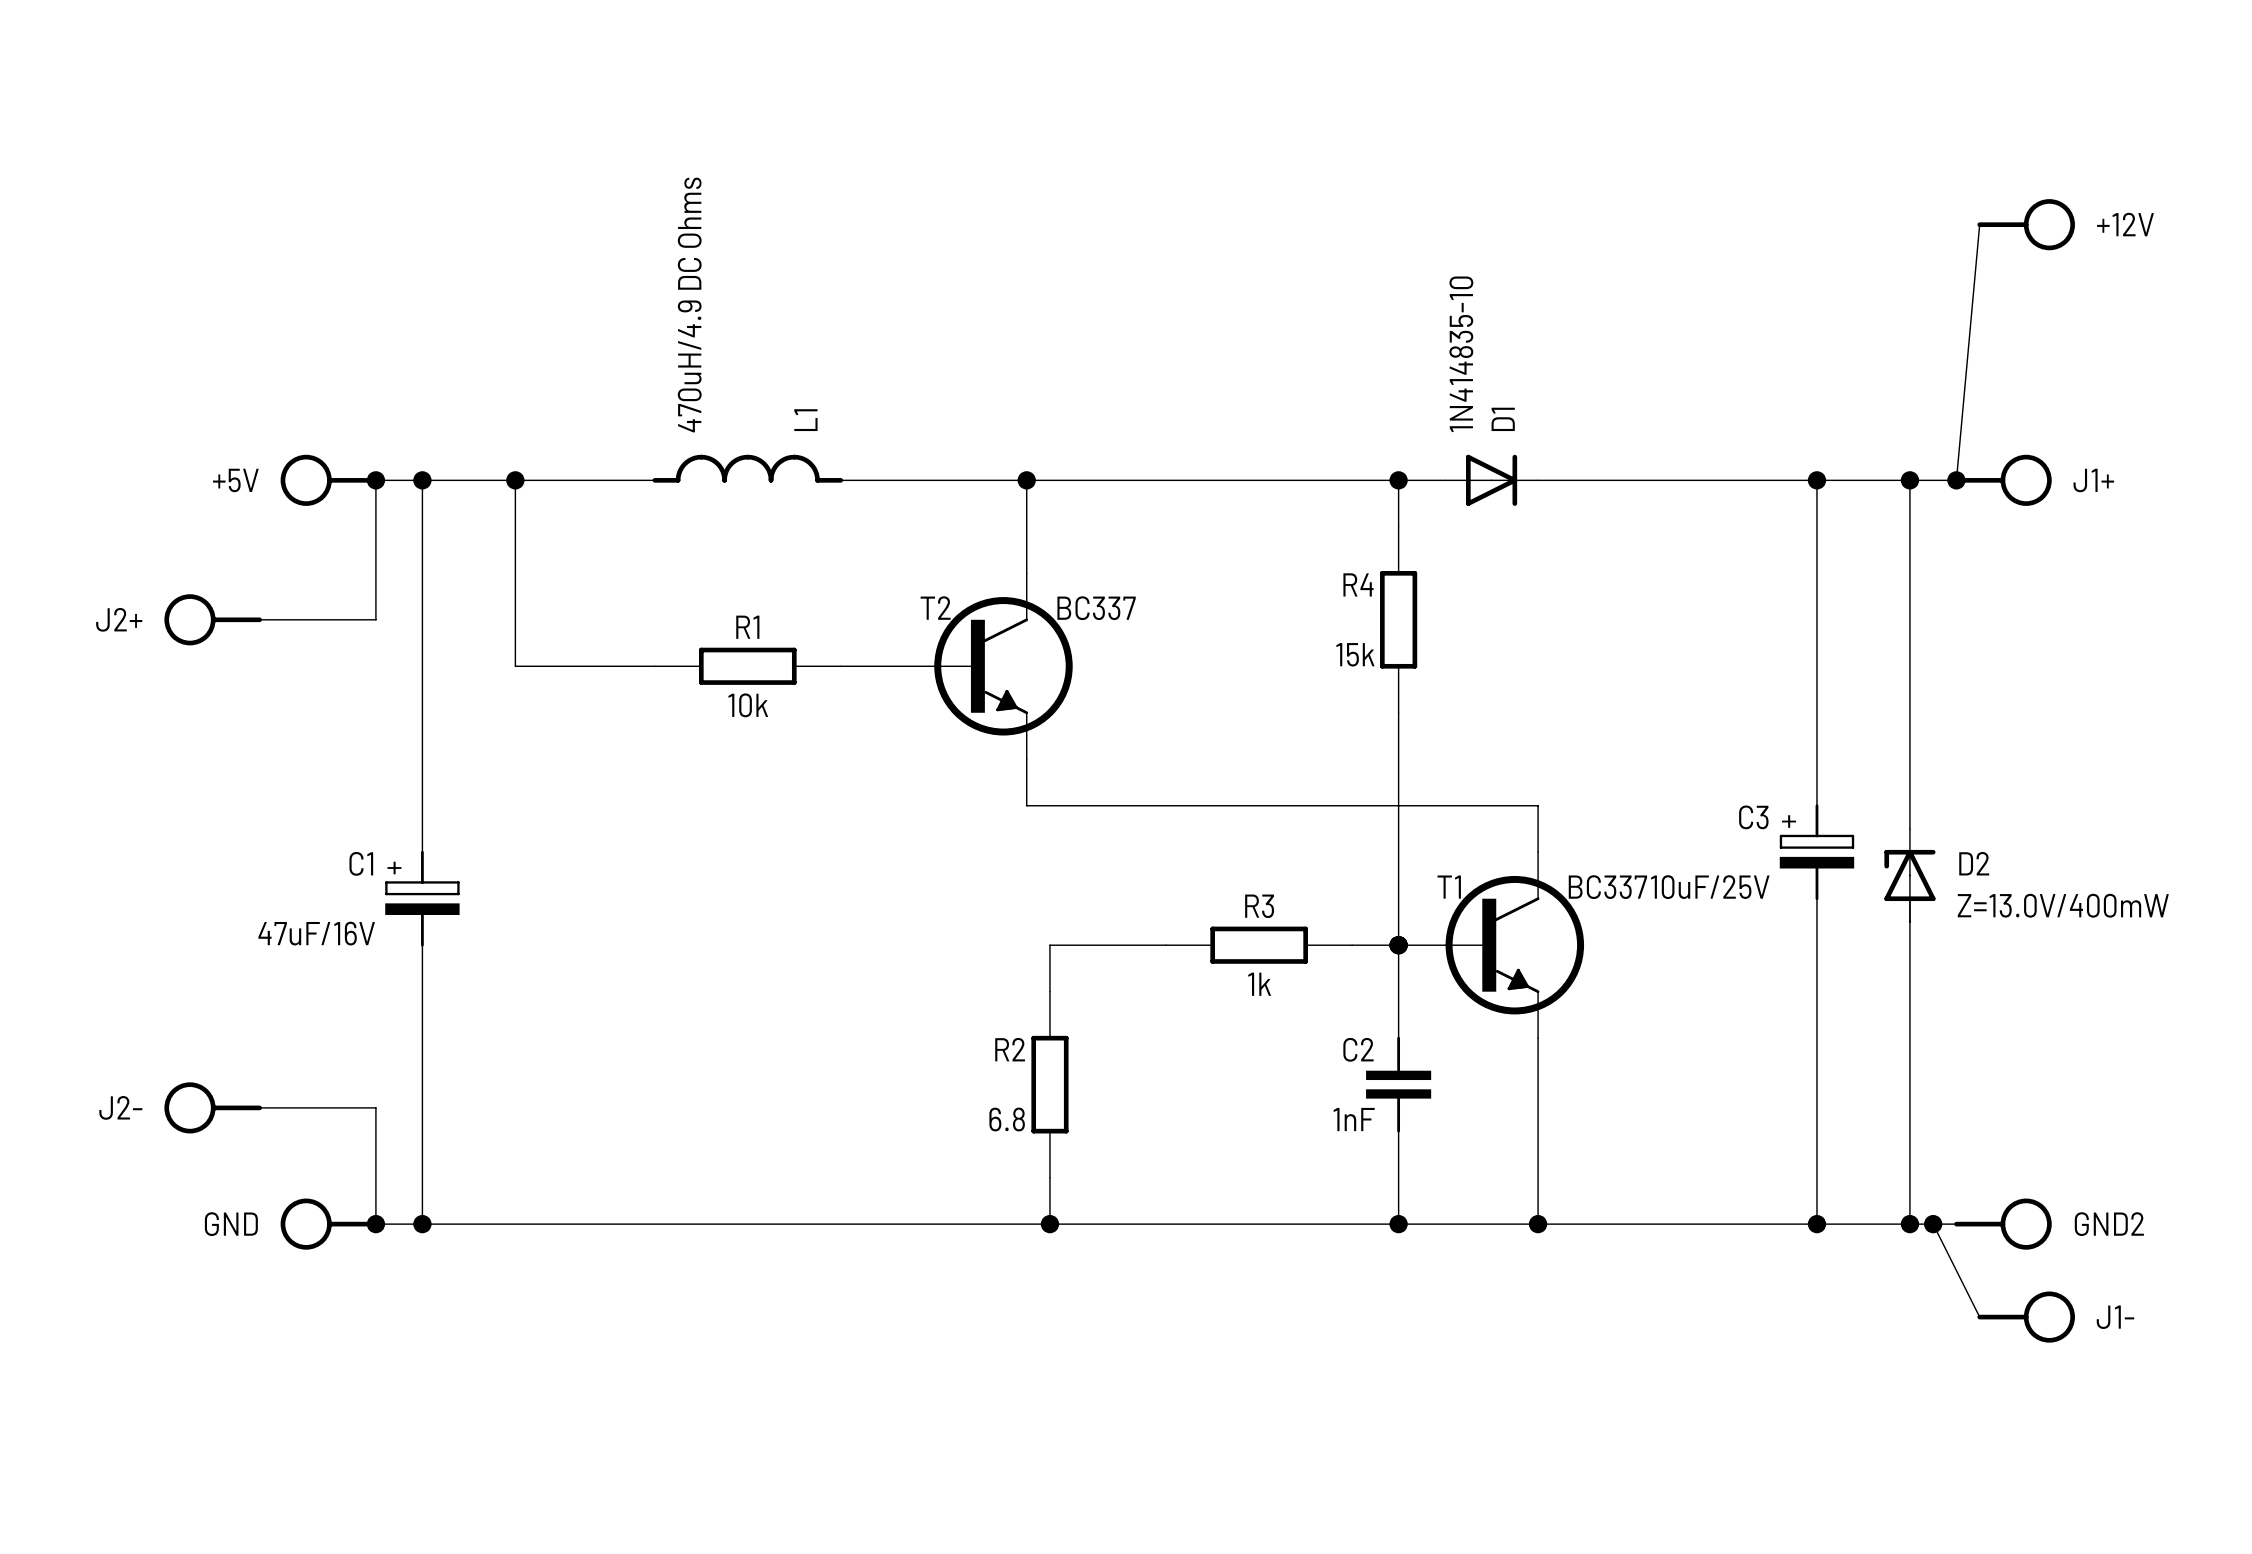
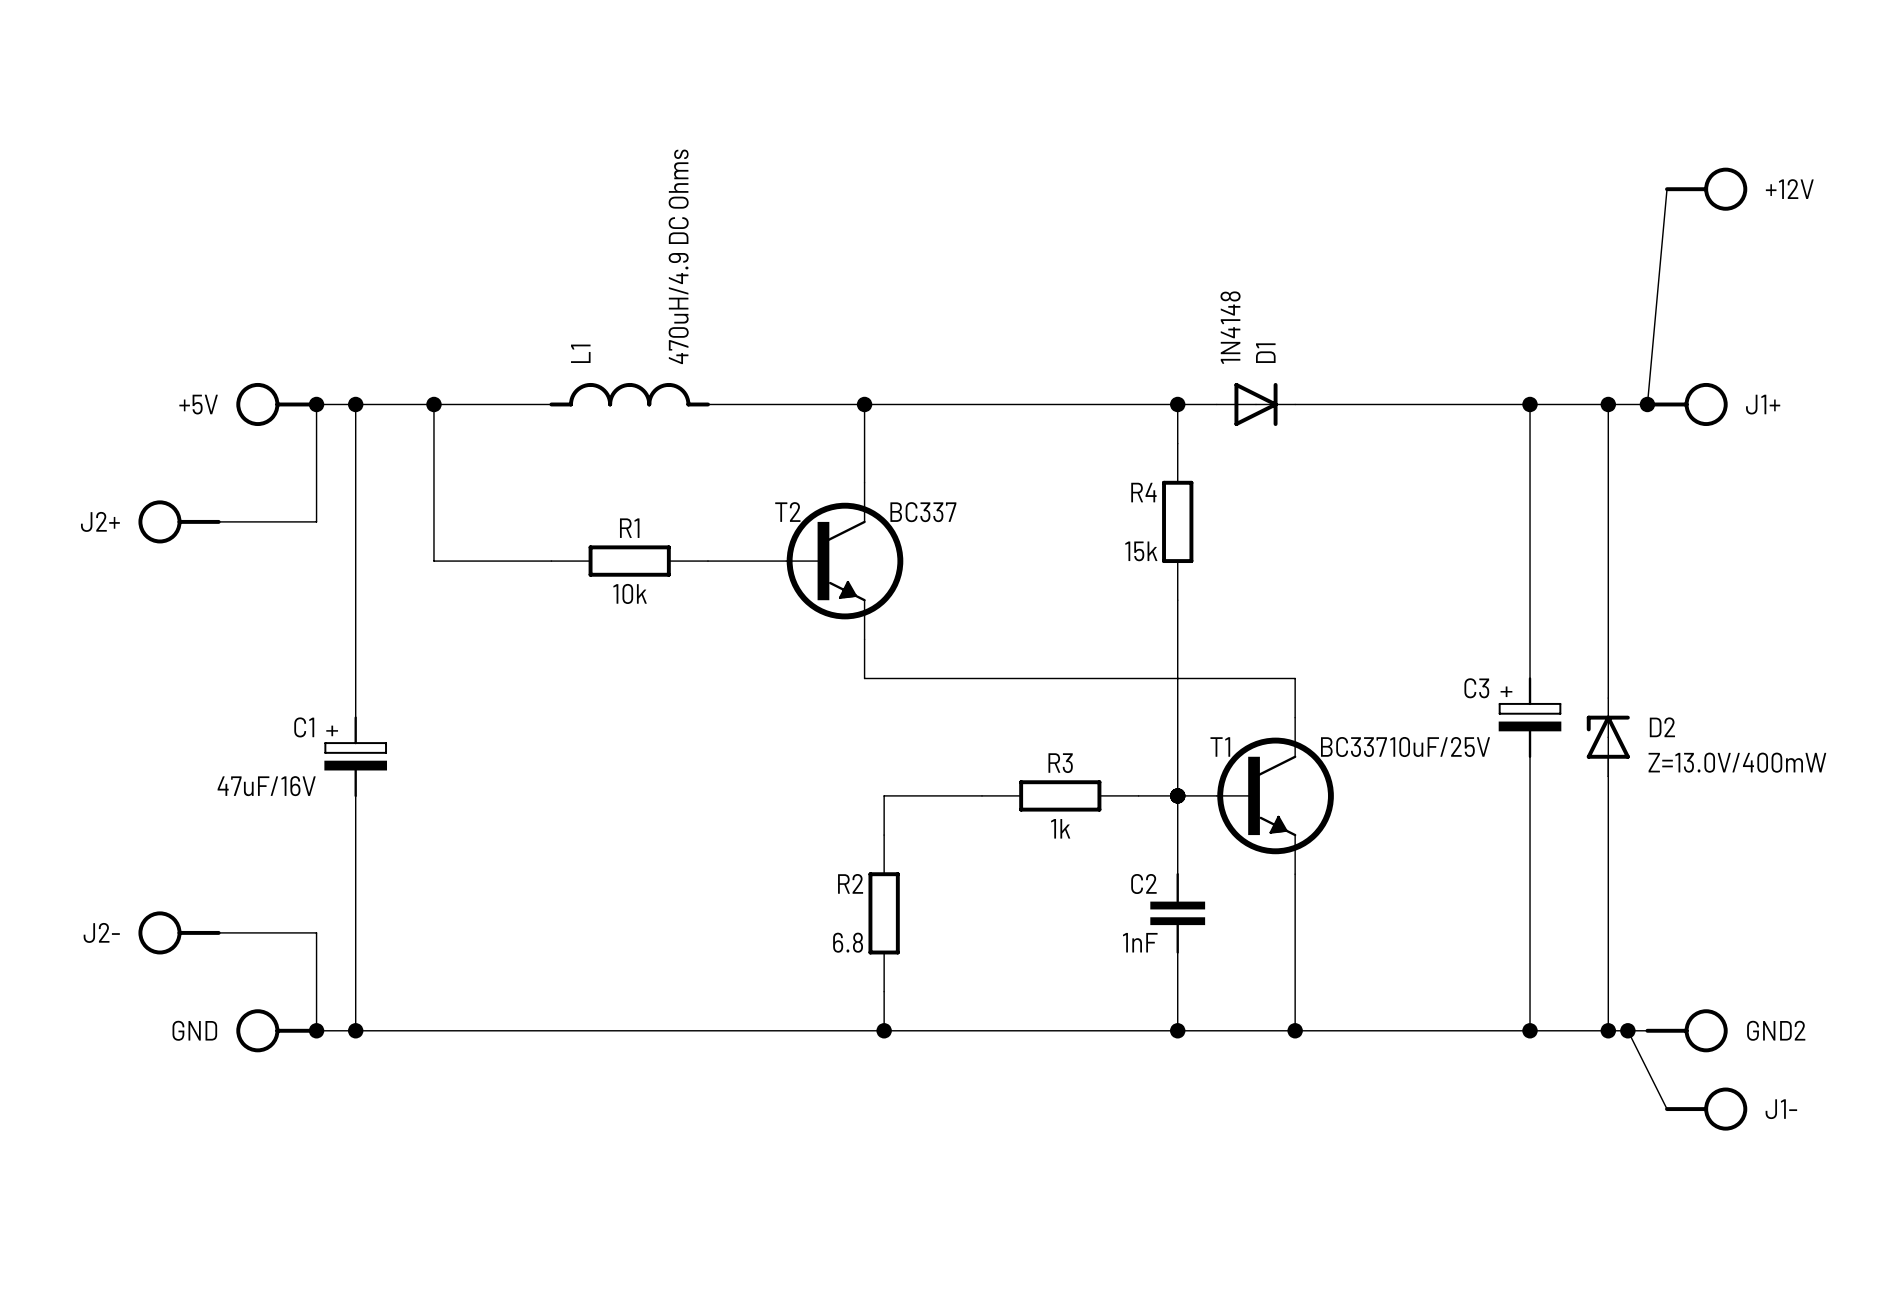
L1 value position: 470uH/4.9 DC Ohms (689, 305) -> 470uH/4.9 DC Ohms (678, 256)
D1 value: 1N414835-10 (1461, 354) -> 1N4148 (1230, 327)
L1 name position: L1 (805, 420) -> L1 (580, 353)

